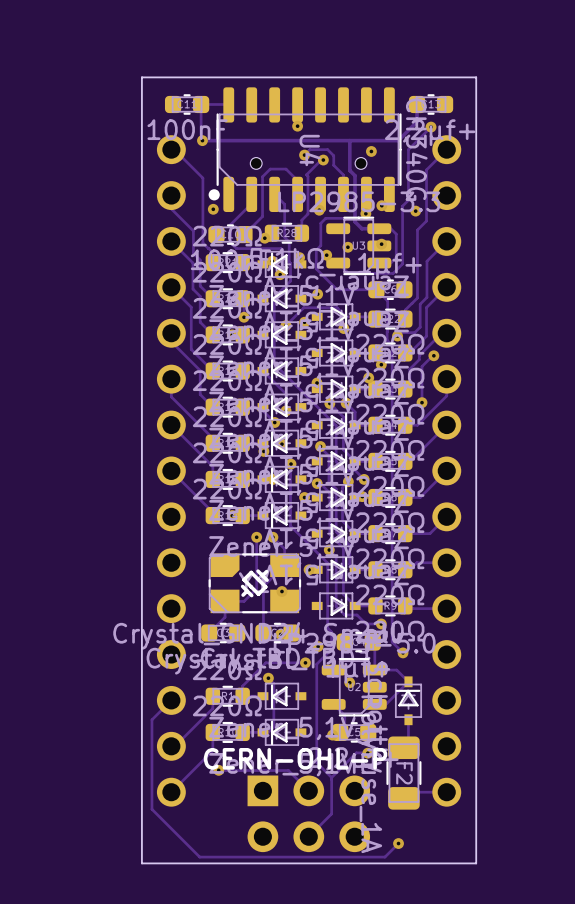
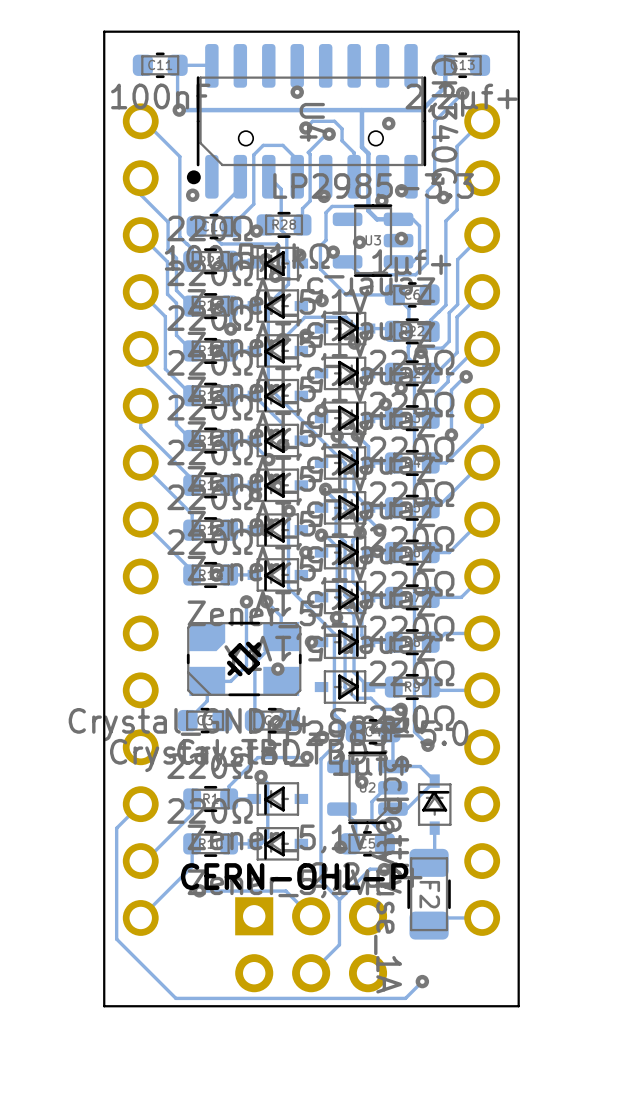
track: none -> (385, 787) (371, 801) (371, 822) (390, 840)

